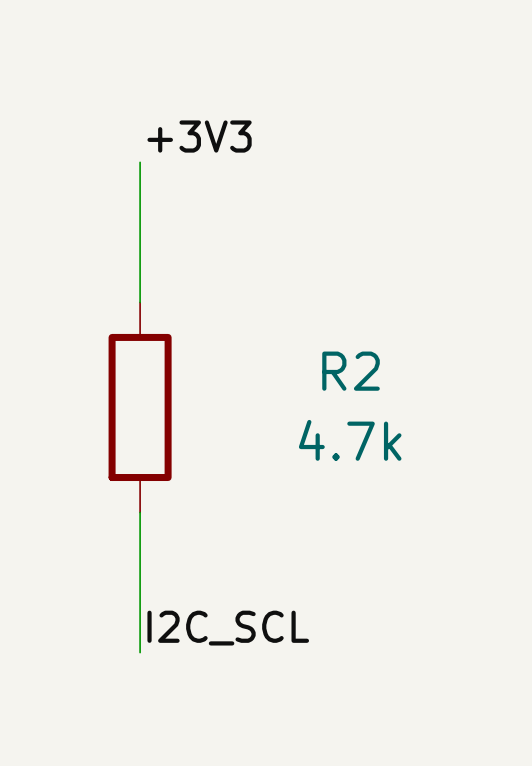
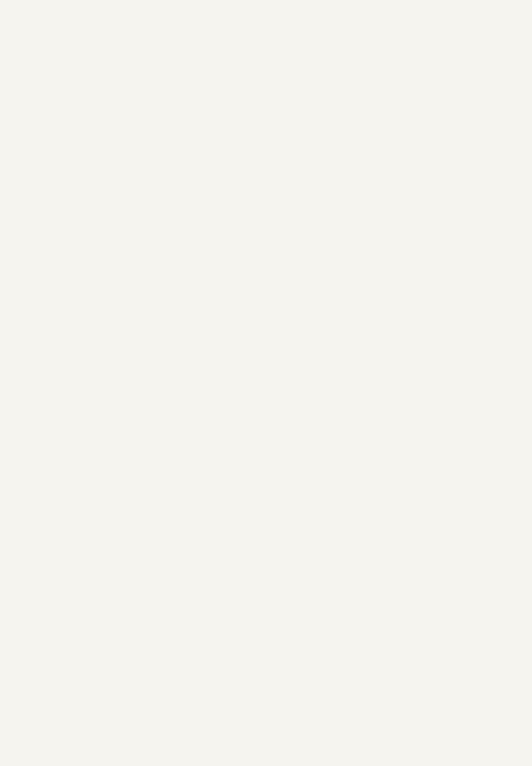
label: +3V3 (199, 136) -> none
wire: (140, 162) (140, 302) -> none
R2: 4.7k (140, 407) -> none
wire: (140, 512) (140, 652) -> none
label: I2C_SCL (228, 628) -> none

